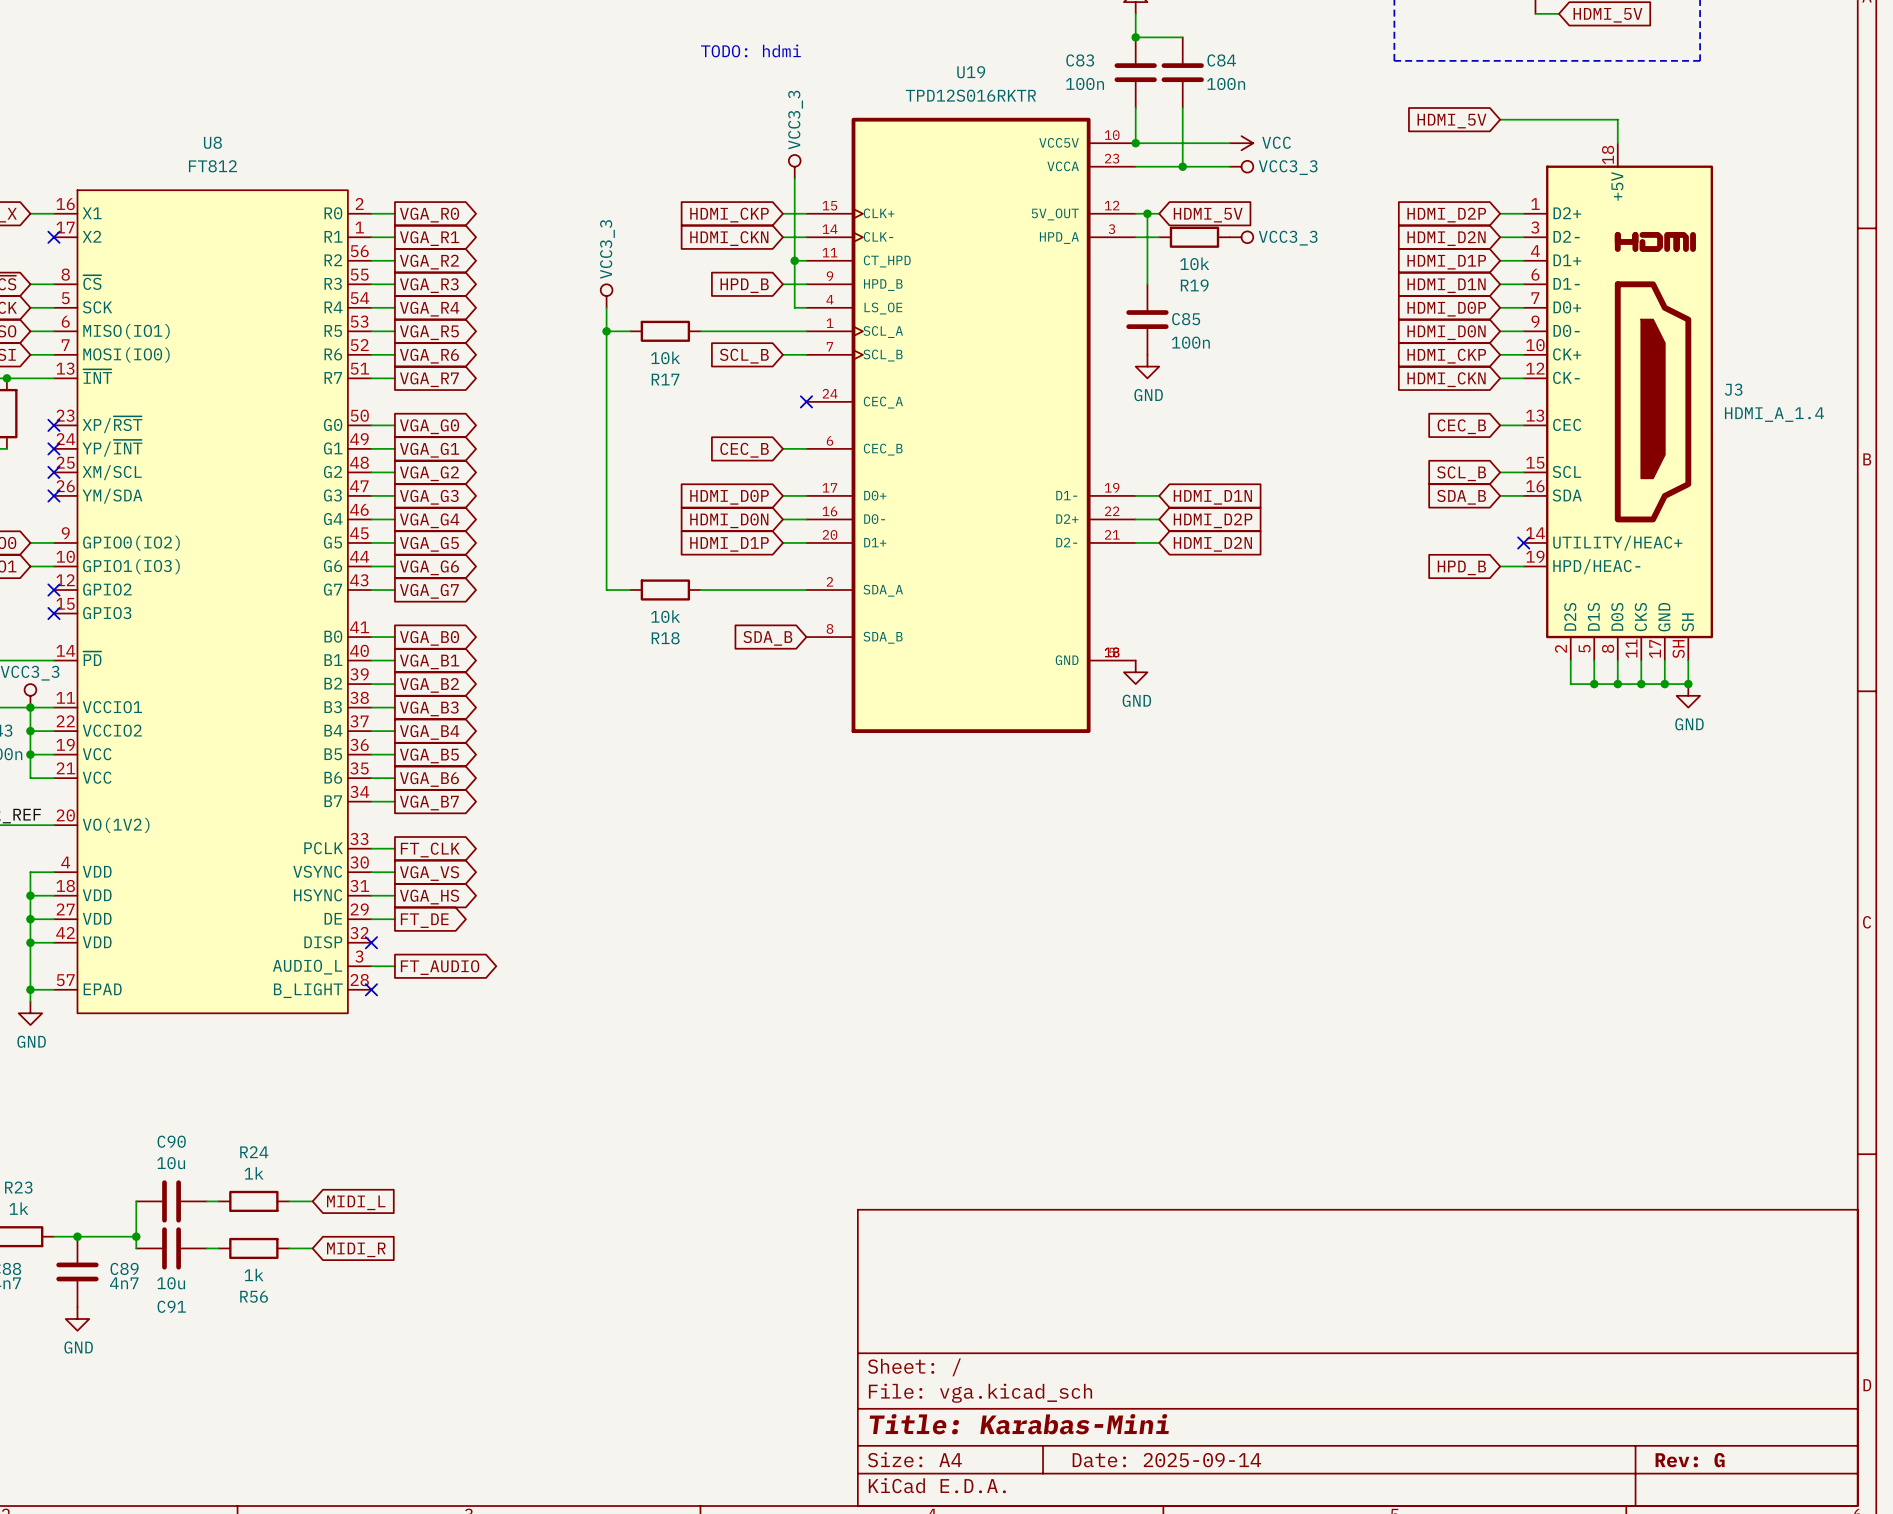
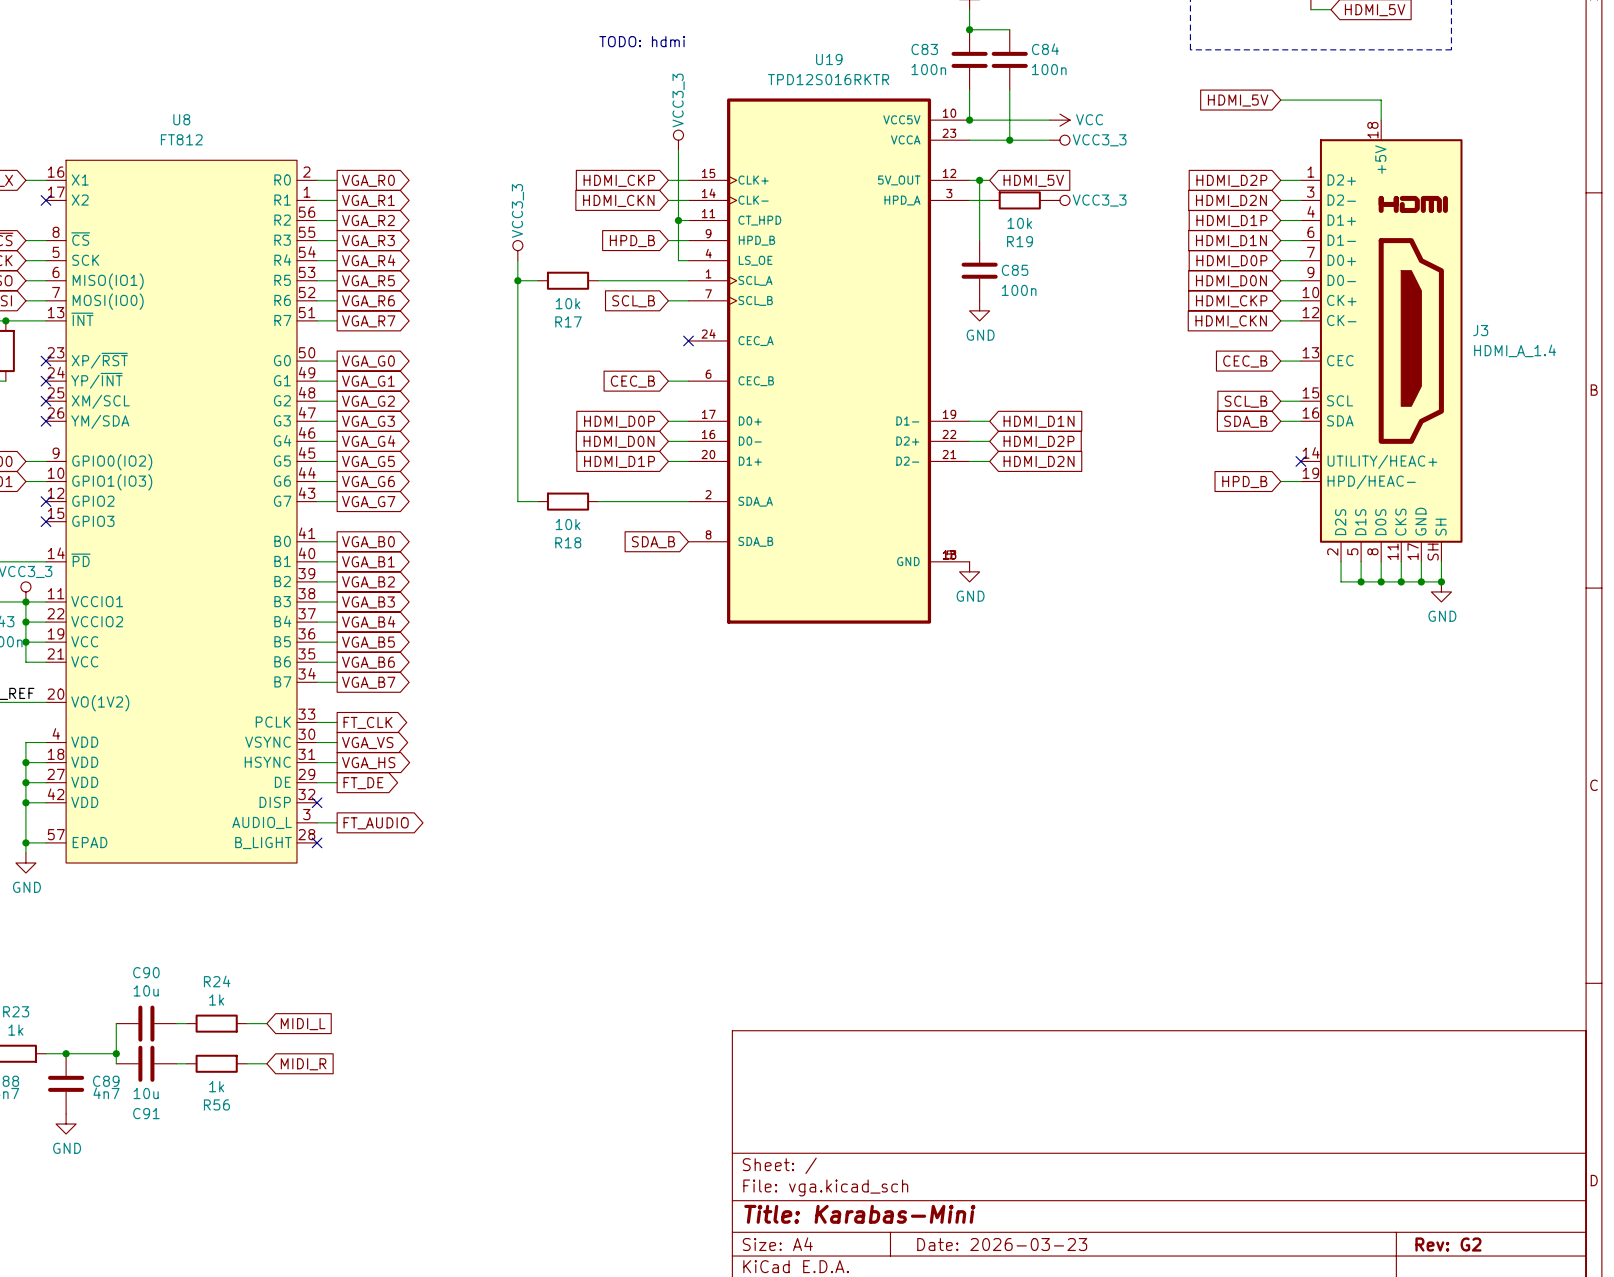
title block: Date: 2025-09-14 (1166, 1460) -> Date: 2026-03-23 (1002, 1244)
title block: Rev: G (1690, 1460) -> Rev: G2 (1448, 1244)

